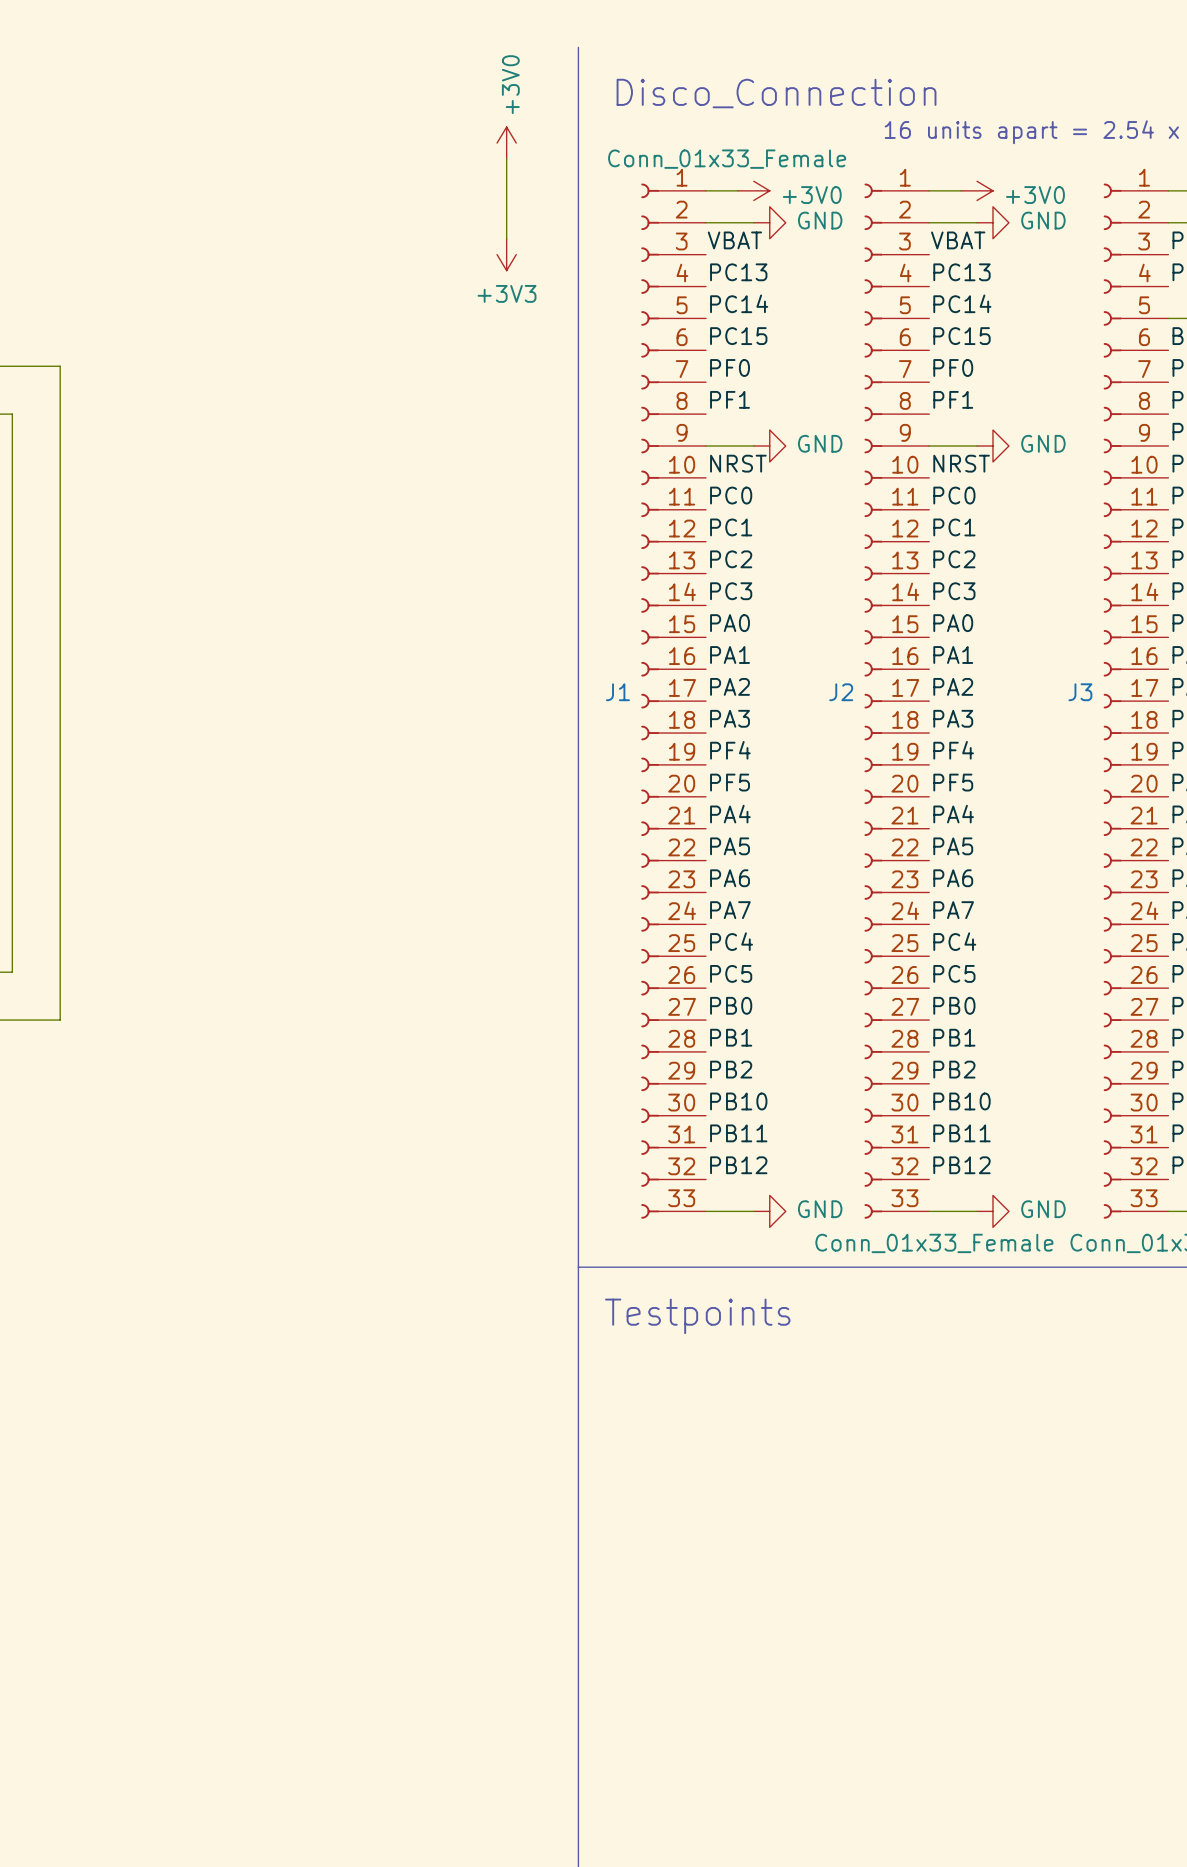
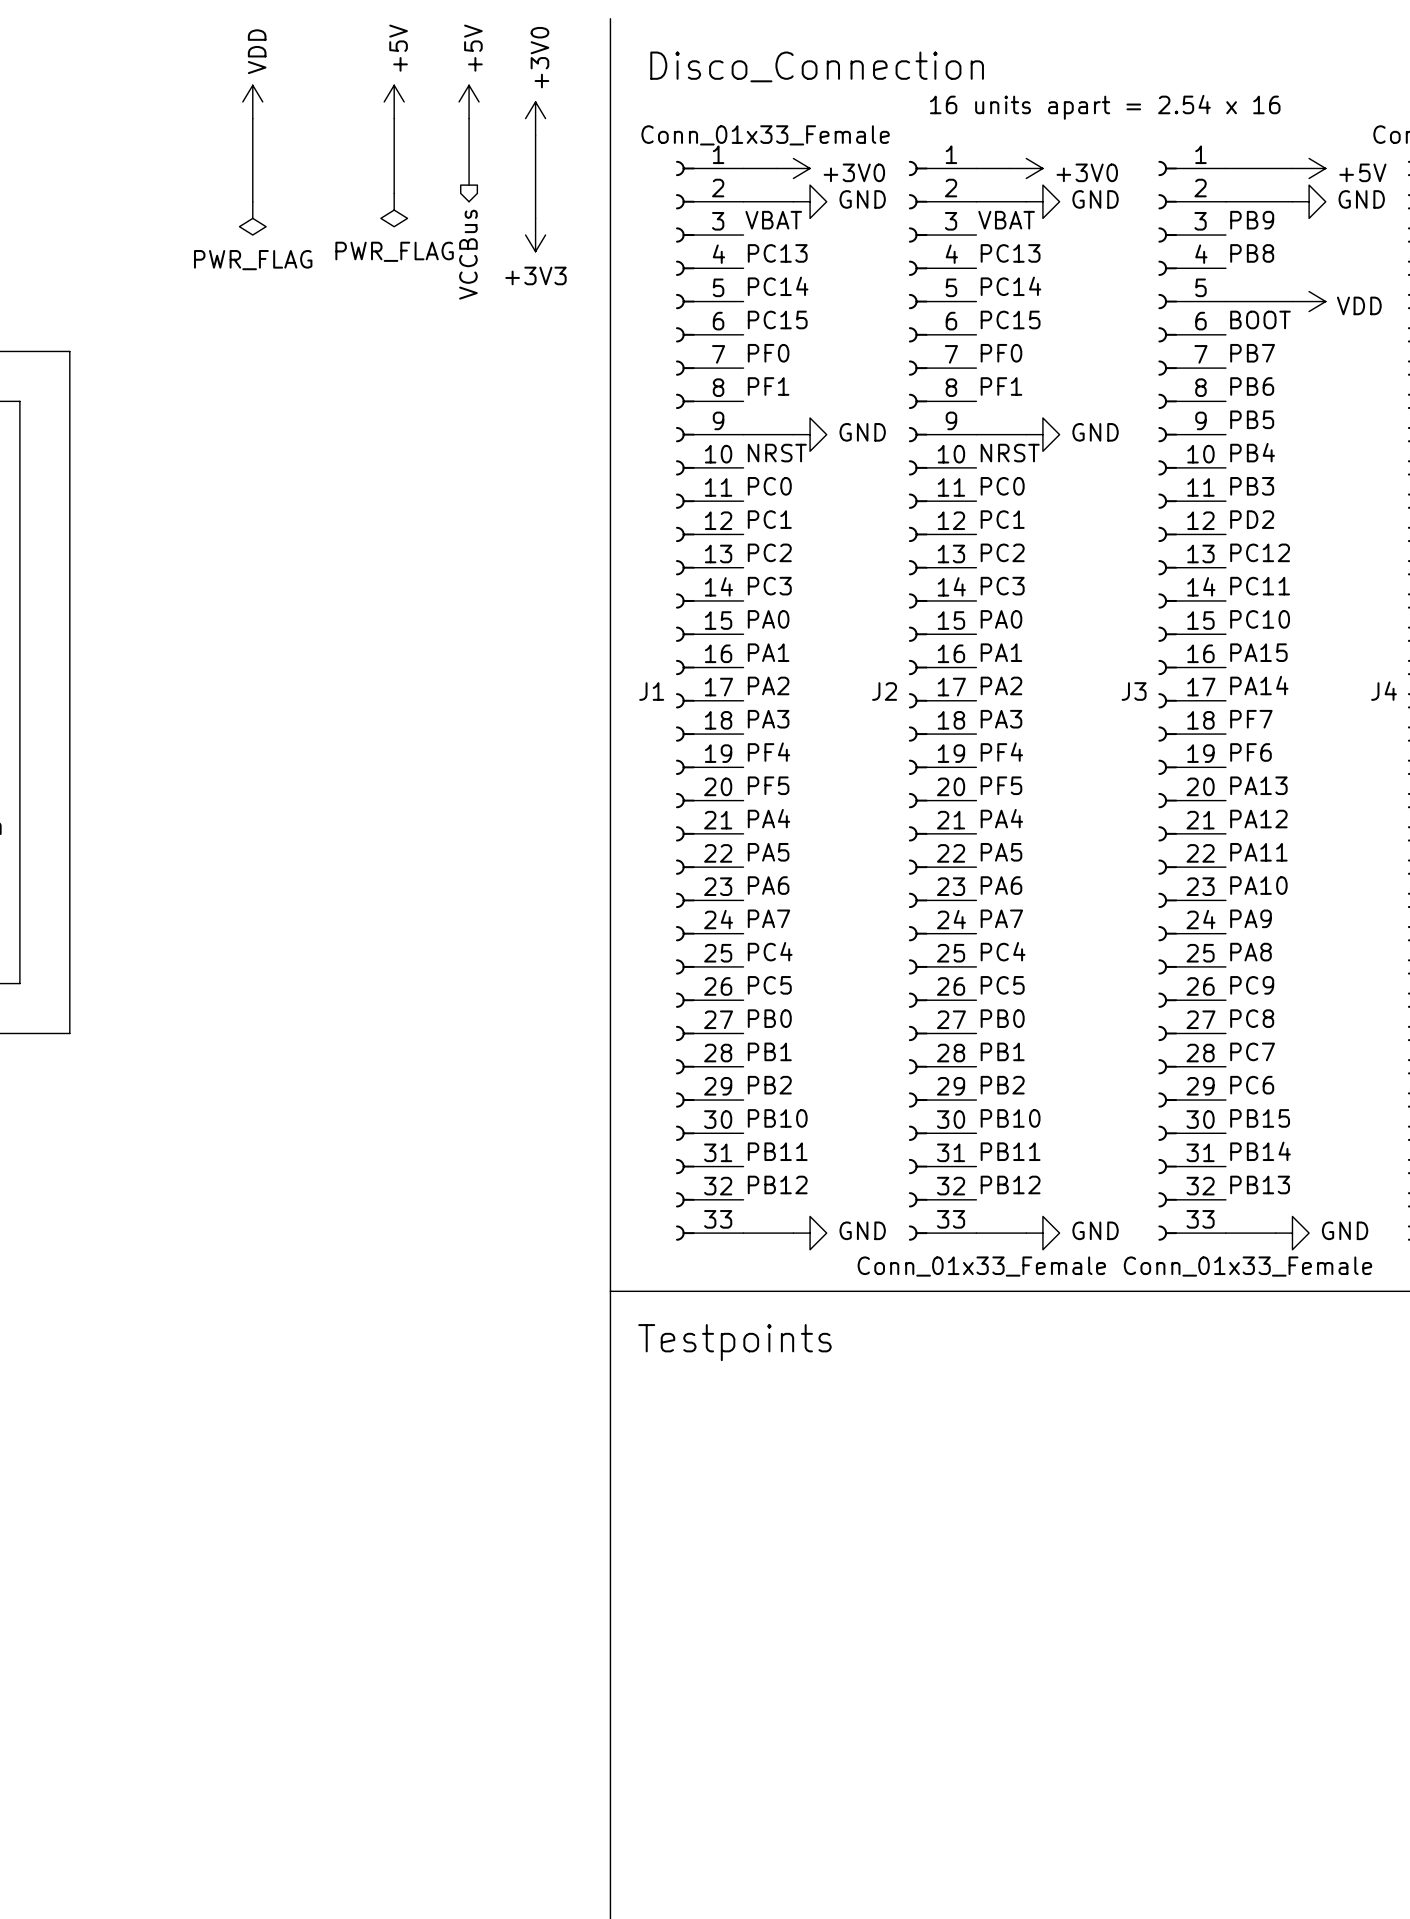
power symbol: none -> VDD (252, 101)
power symbol: none -> +5V (394, 101)
power symbol: none -> +5V (469, 101)
wire: none -> (252, 118) (252, 201)
wire: none -> (394, 118) (394, 193)
wire: none -> (469, 118) (469, 185)
power symbol: none -> PWR_FLAG (394, 210)
power symbol: none -> PWR_FLAG (252, 218)
hierarchical label: none -> VCCBus (468, 254)

